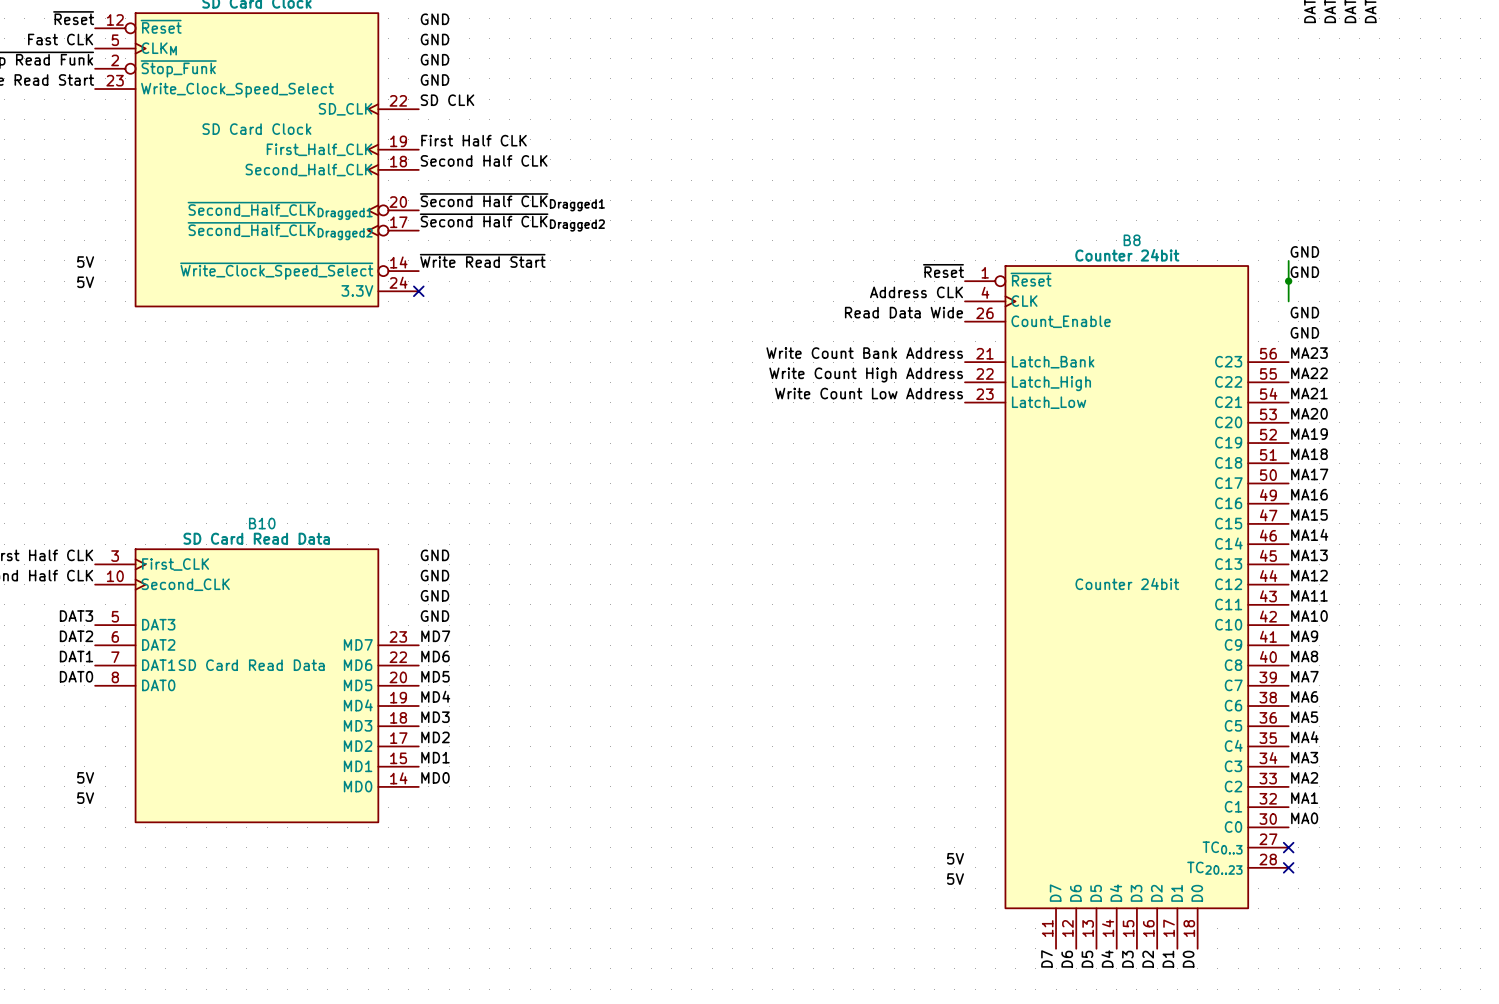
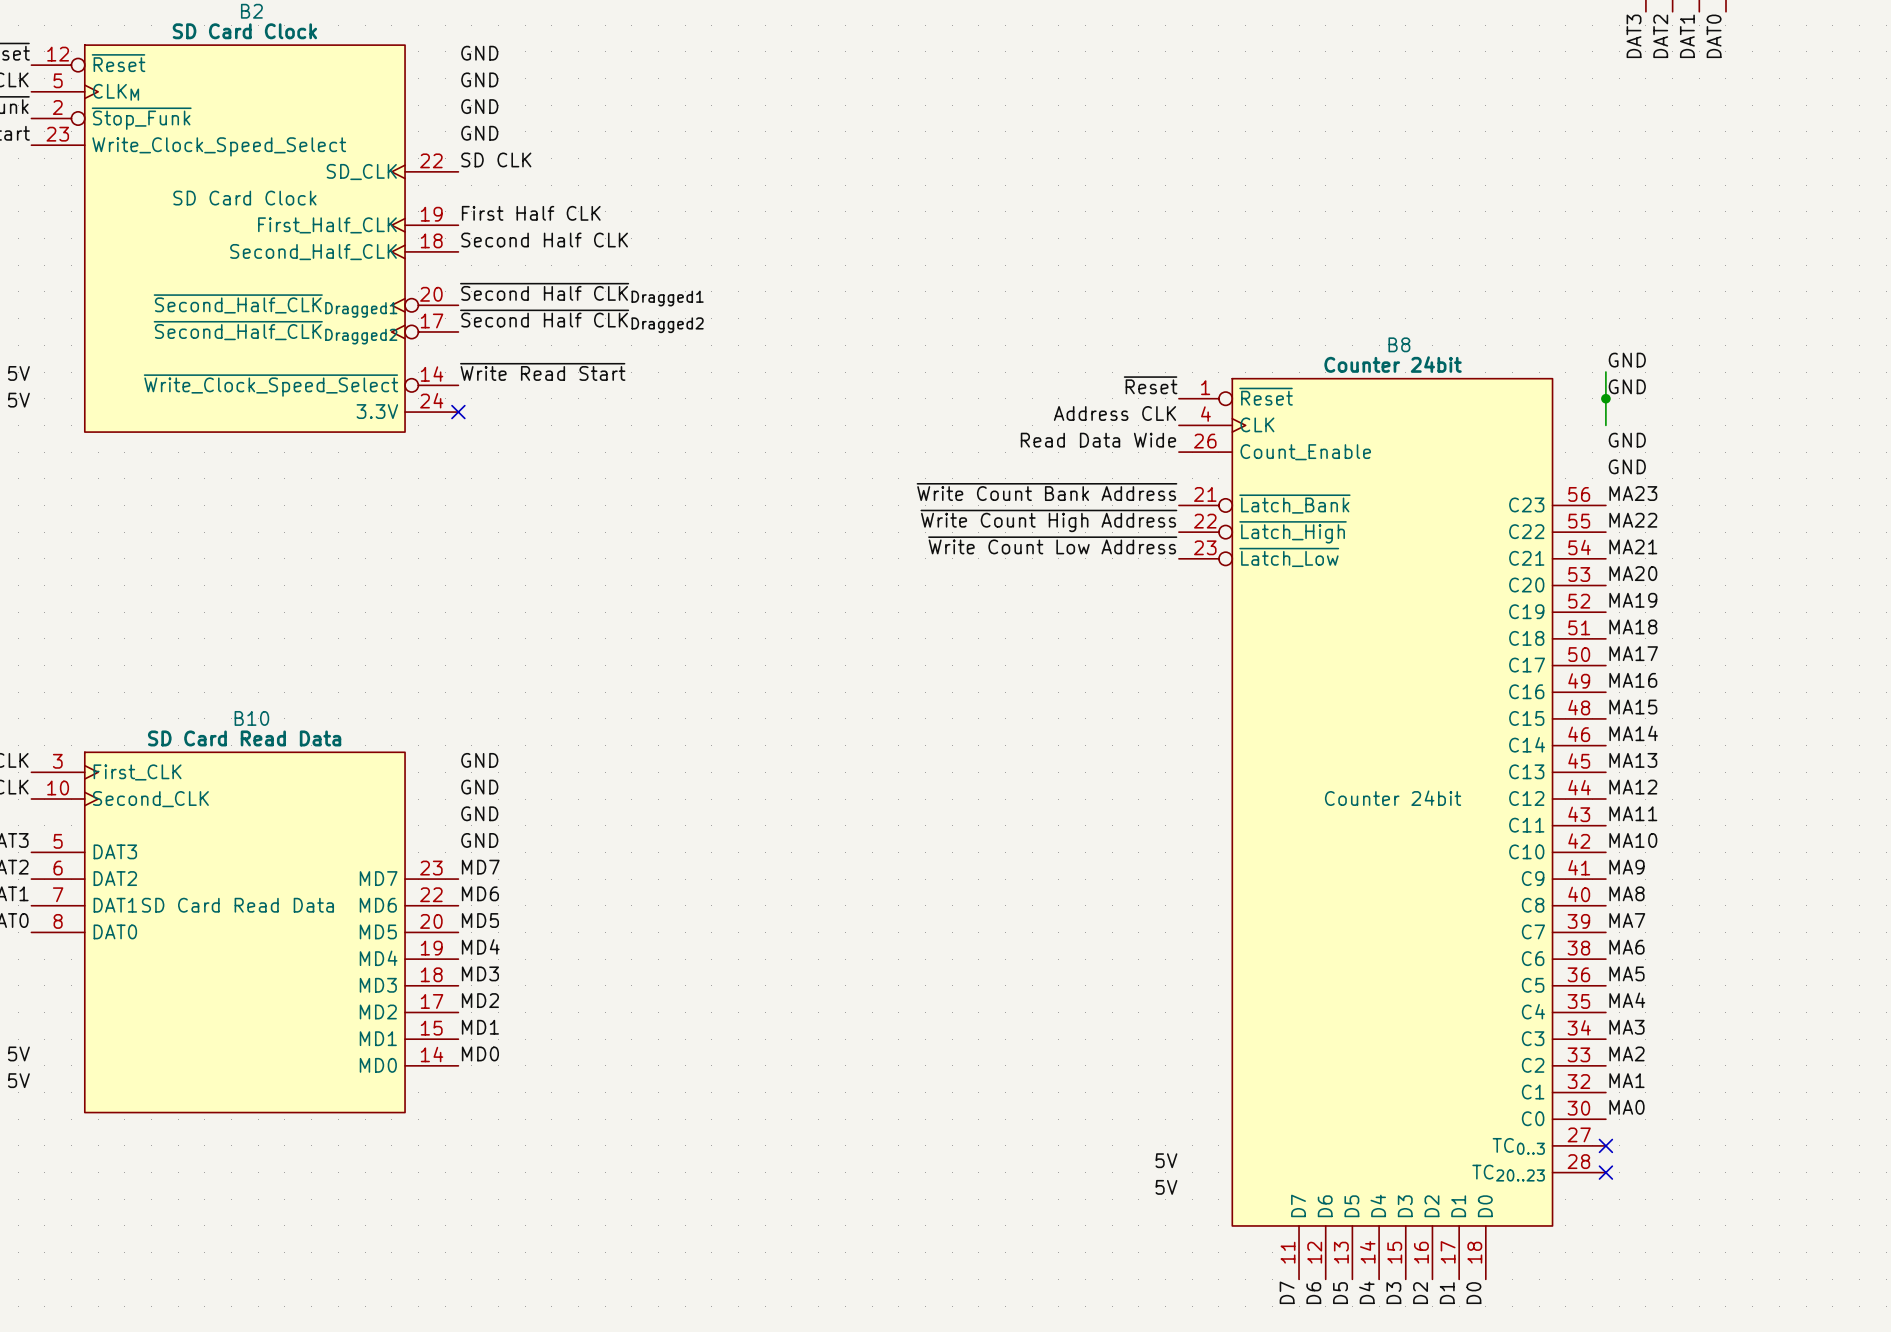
B8 symbol: [964, 265, 1289, 949] -> [1178, 377, 1606, 1280]
label: Write Count Bank Address (864, 353) -> ~{Write Count Bank Address} (1046, 492)
label: Write Count High Address (866, 374) -> ~{Write Count High Address} (1048, 520)
label: Write Count Low Address (869, 393) -> ~{Write Count Low Address} (1052, 545)

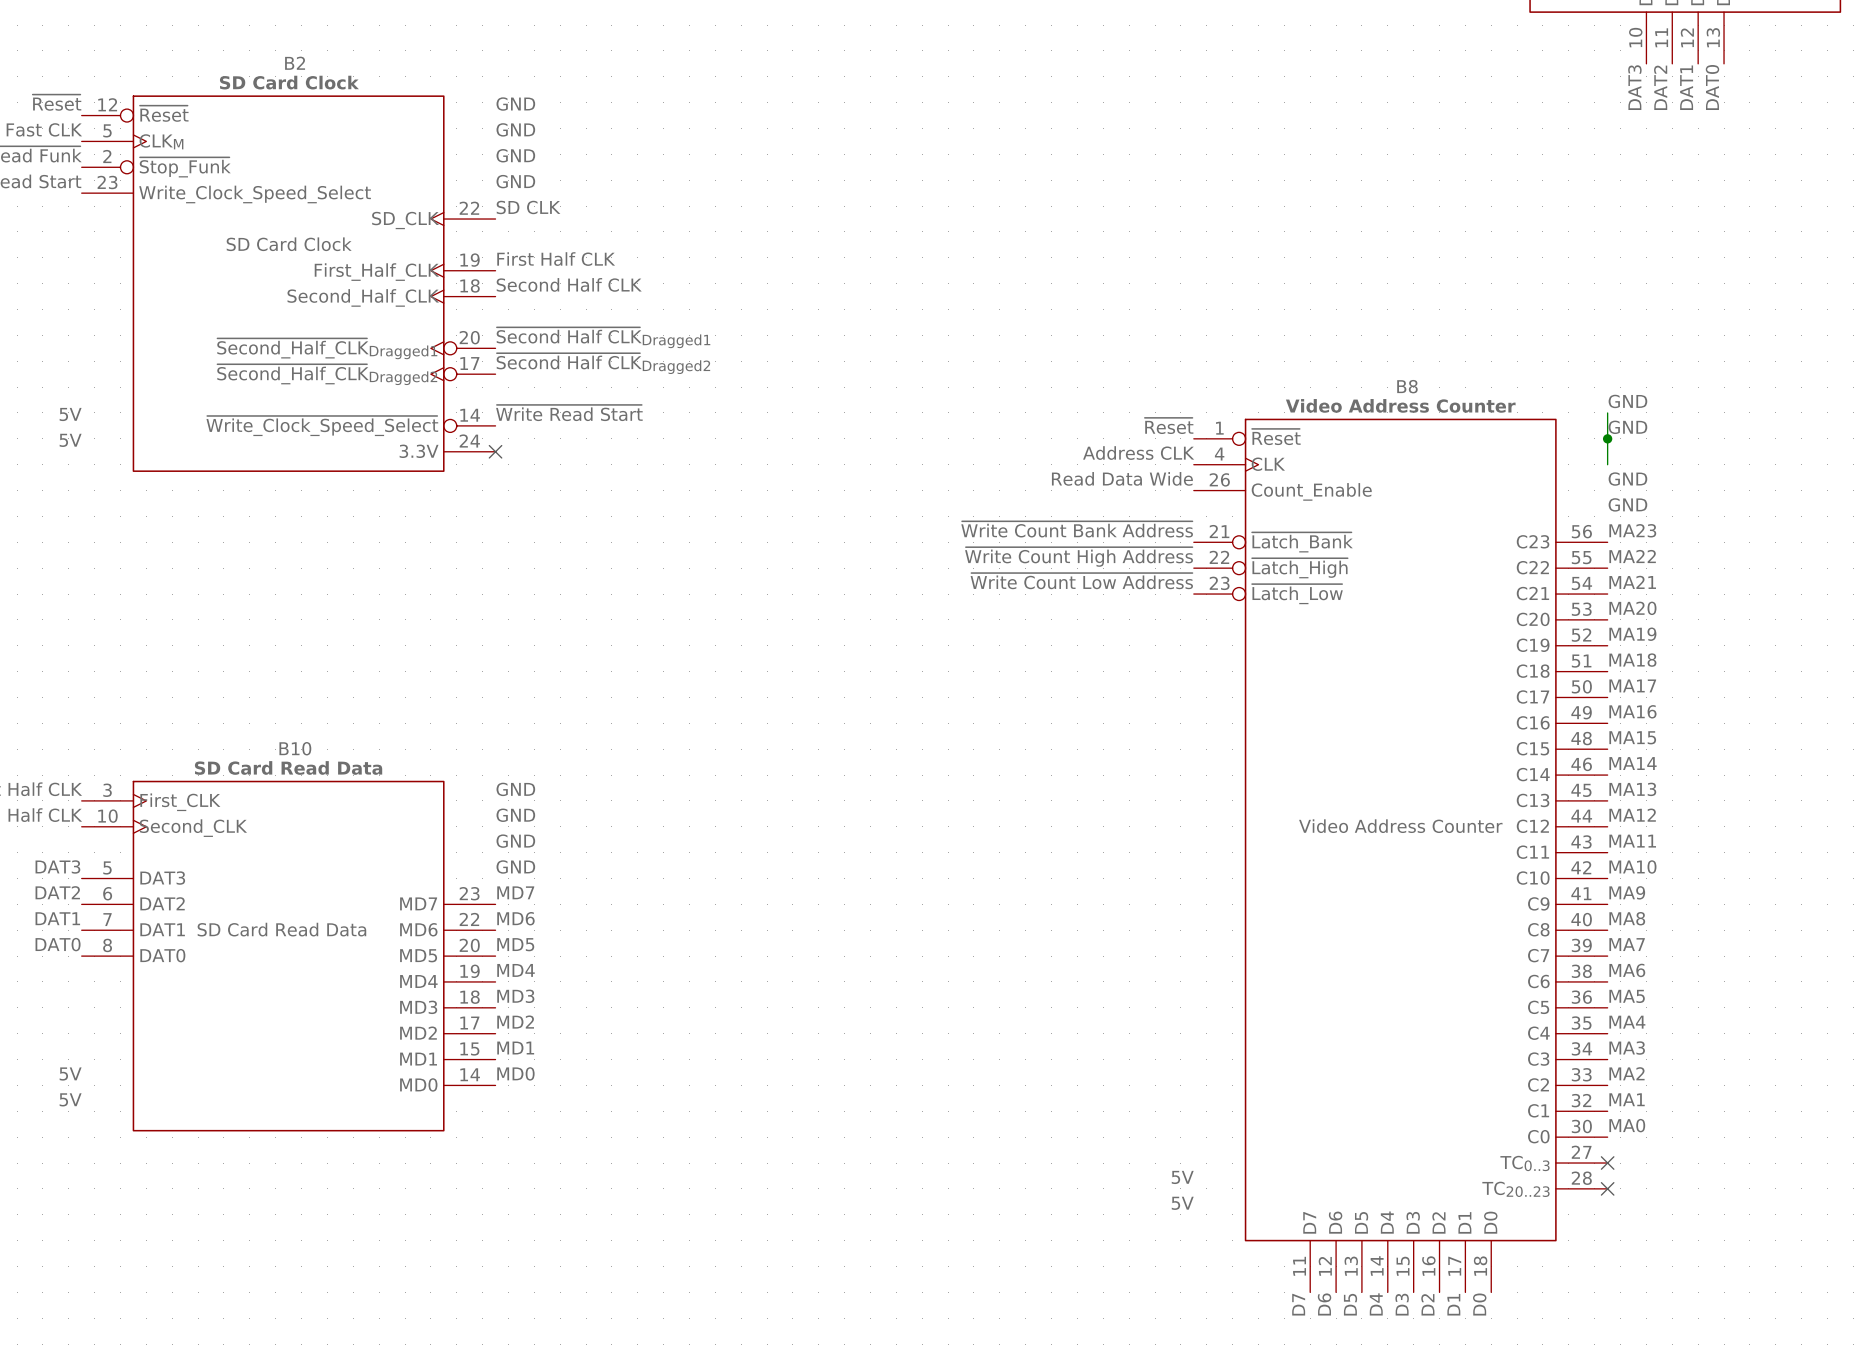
B8 value: Counter 24bit (1393, 364) -> Video Address Counter (1400, 405)
B8 text: Counter 24bit (1393, 798) -> Video Address Counter (1400, 826)

